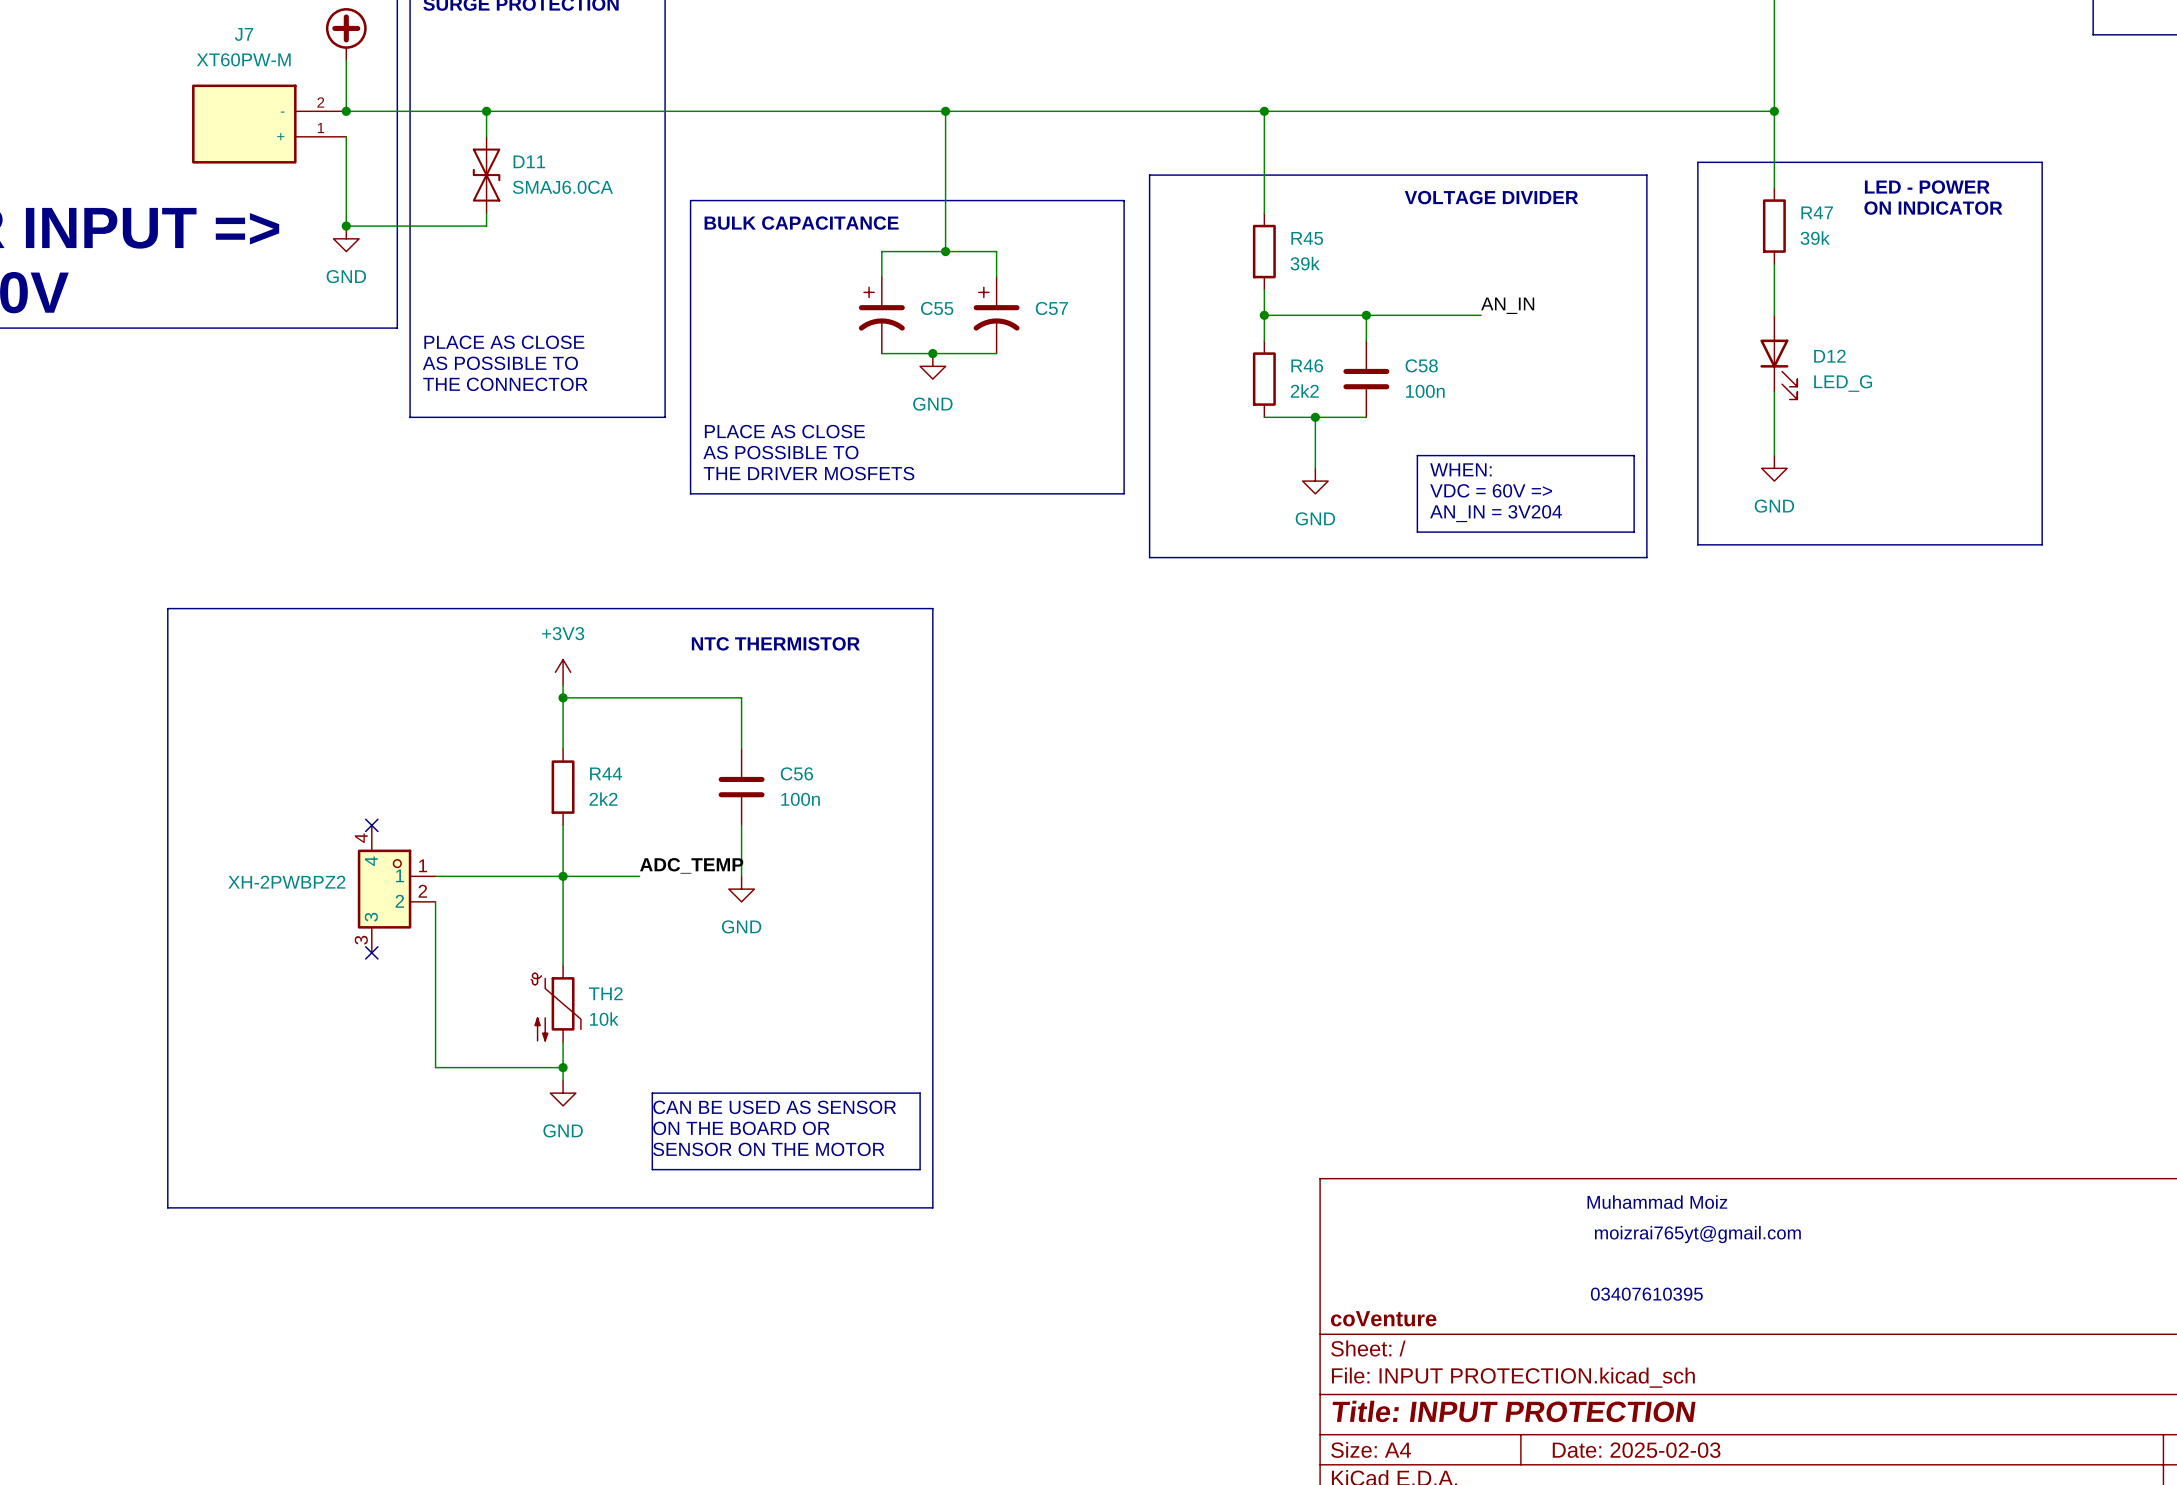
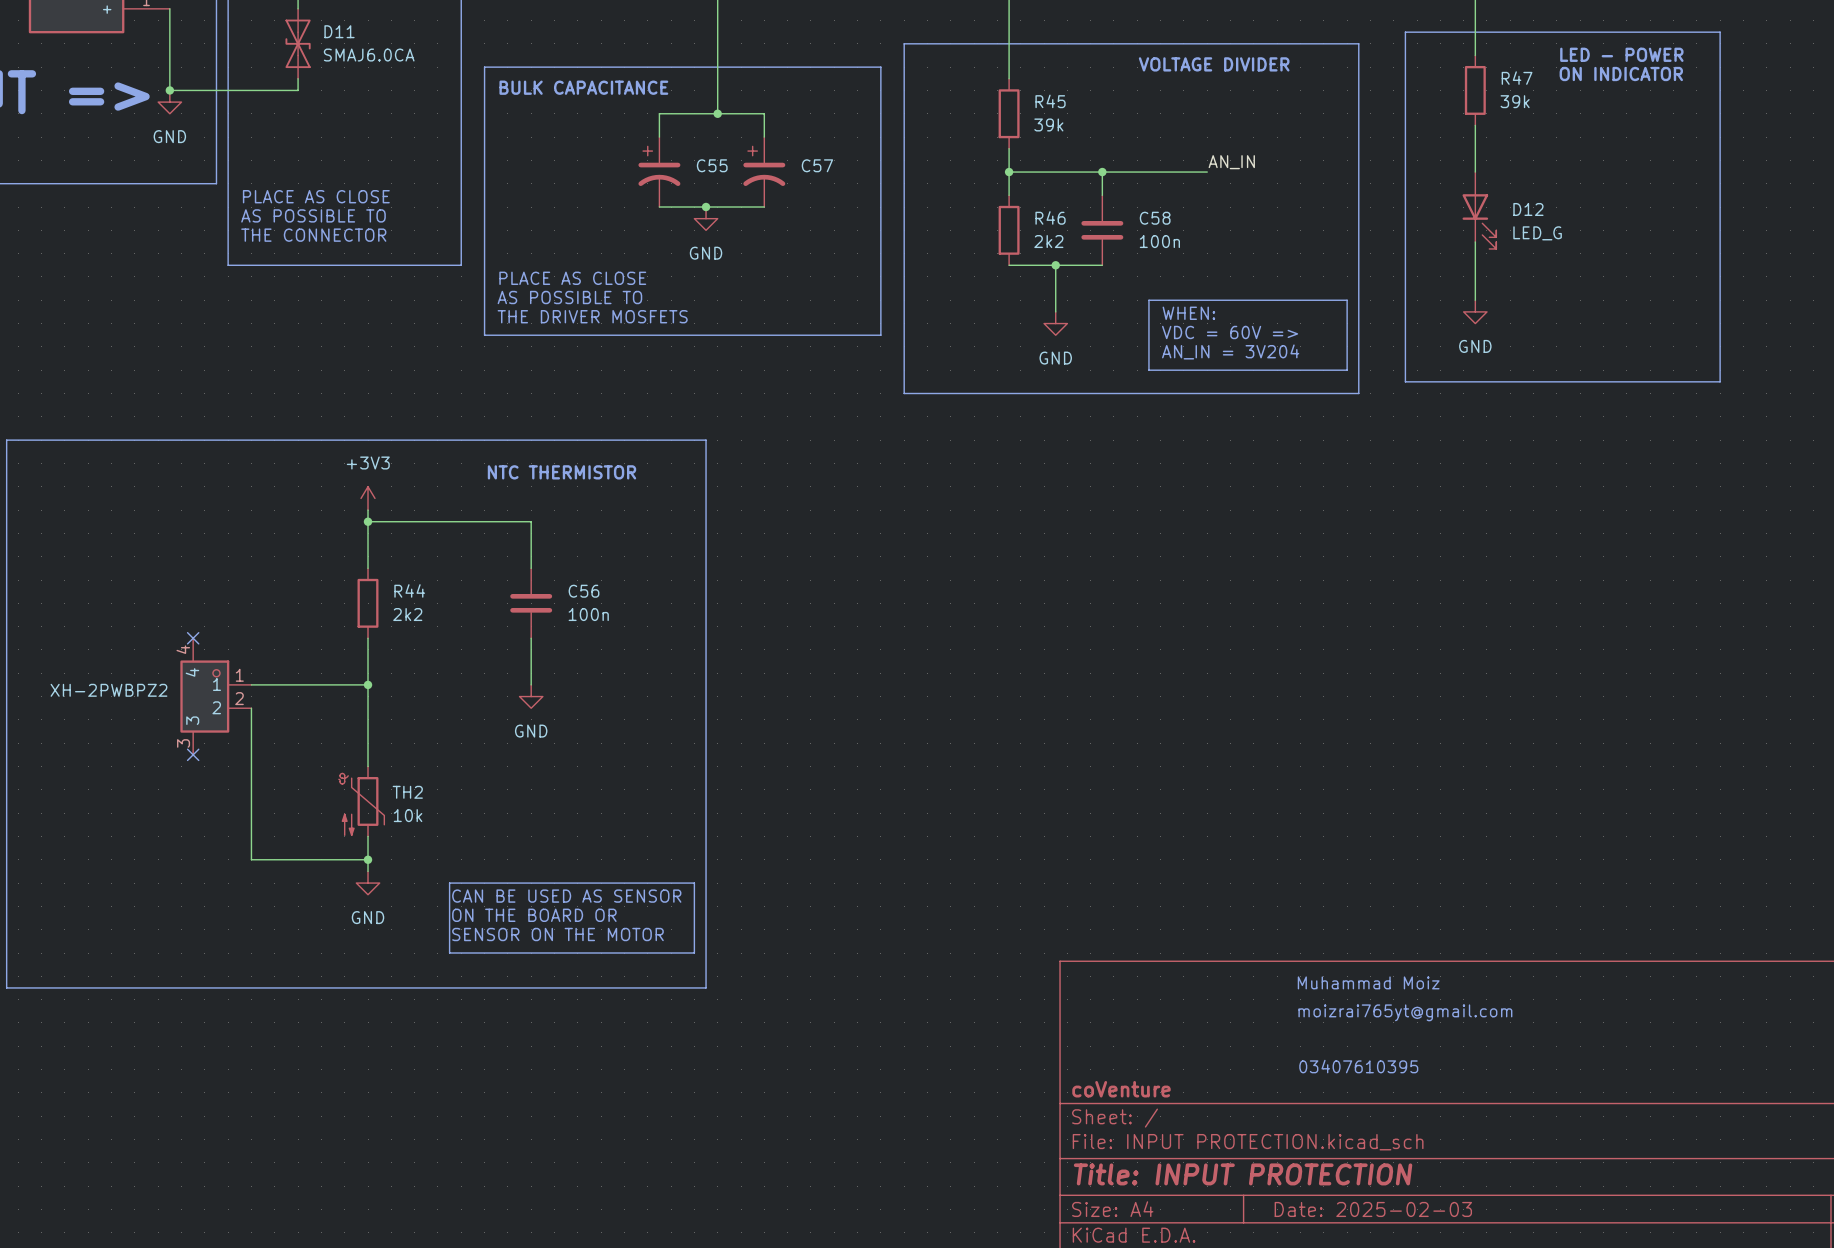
label: ADC_TEMP (691, 865) -> none
wire: (563, 876) (639, 876) -> none

